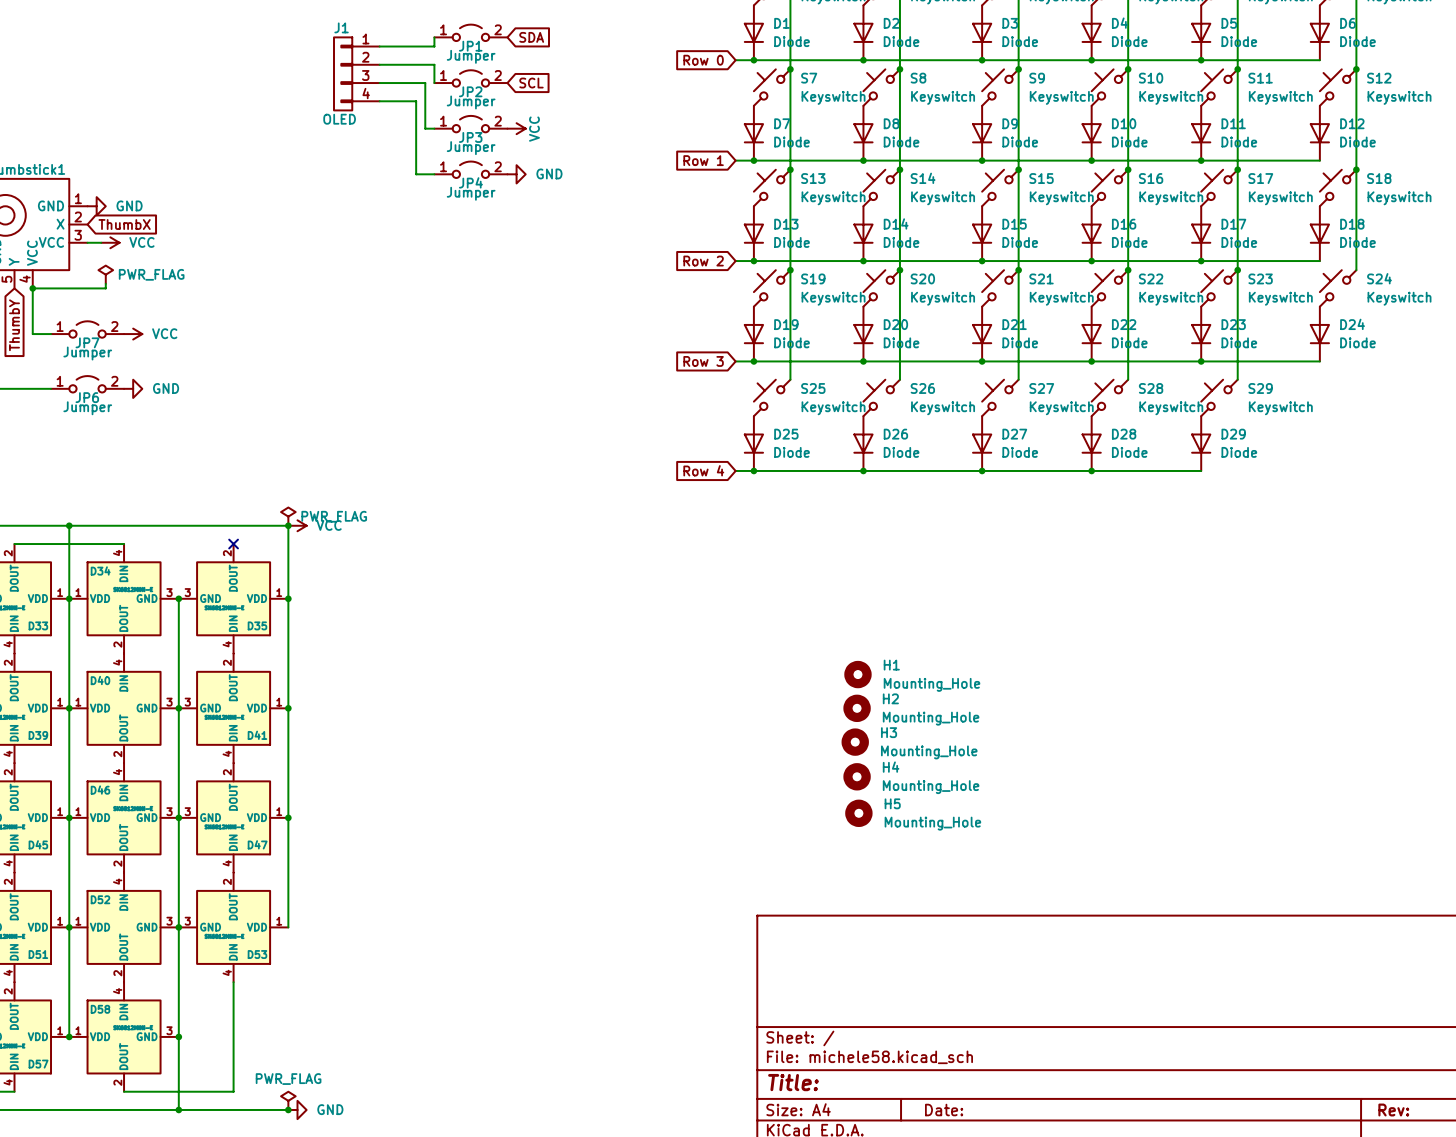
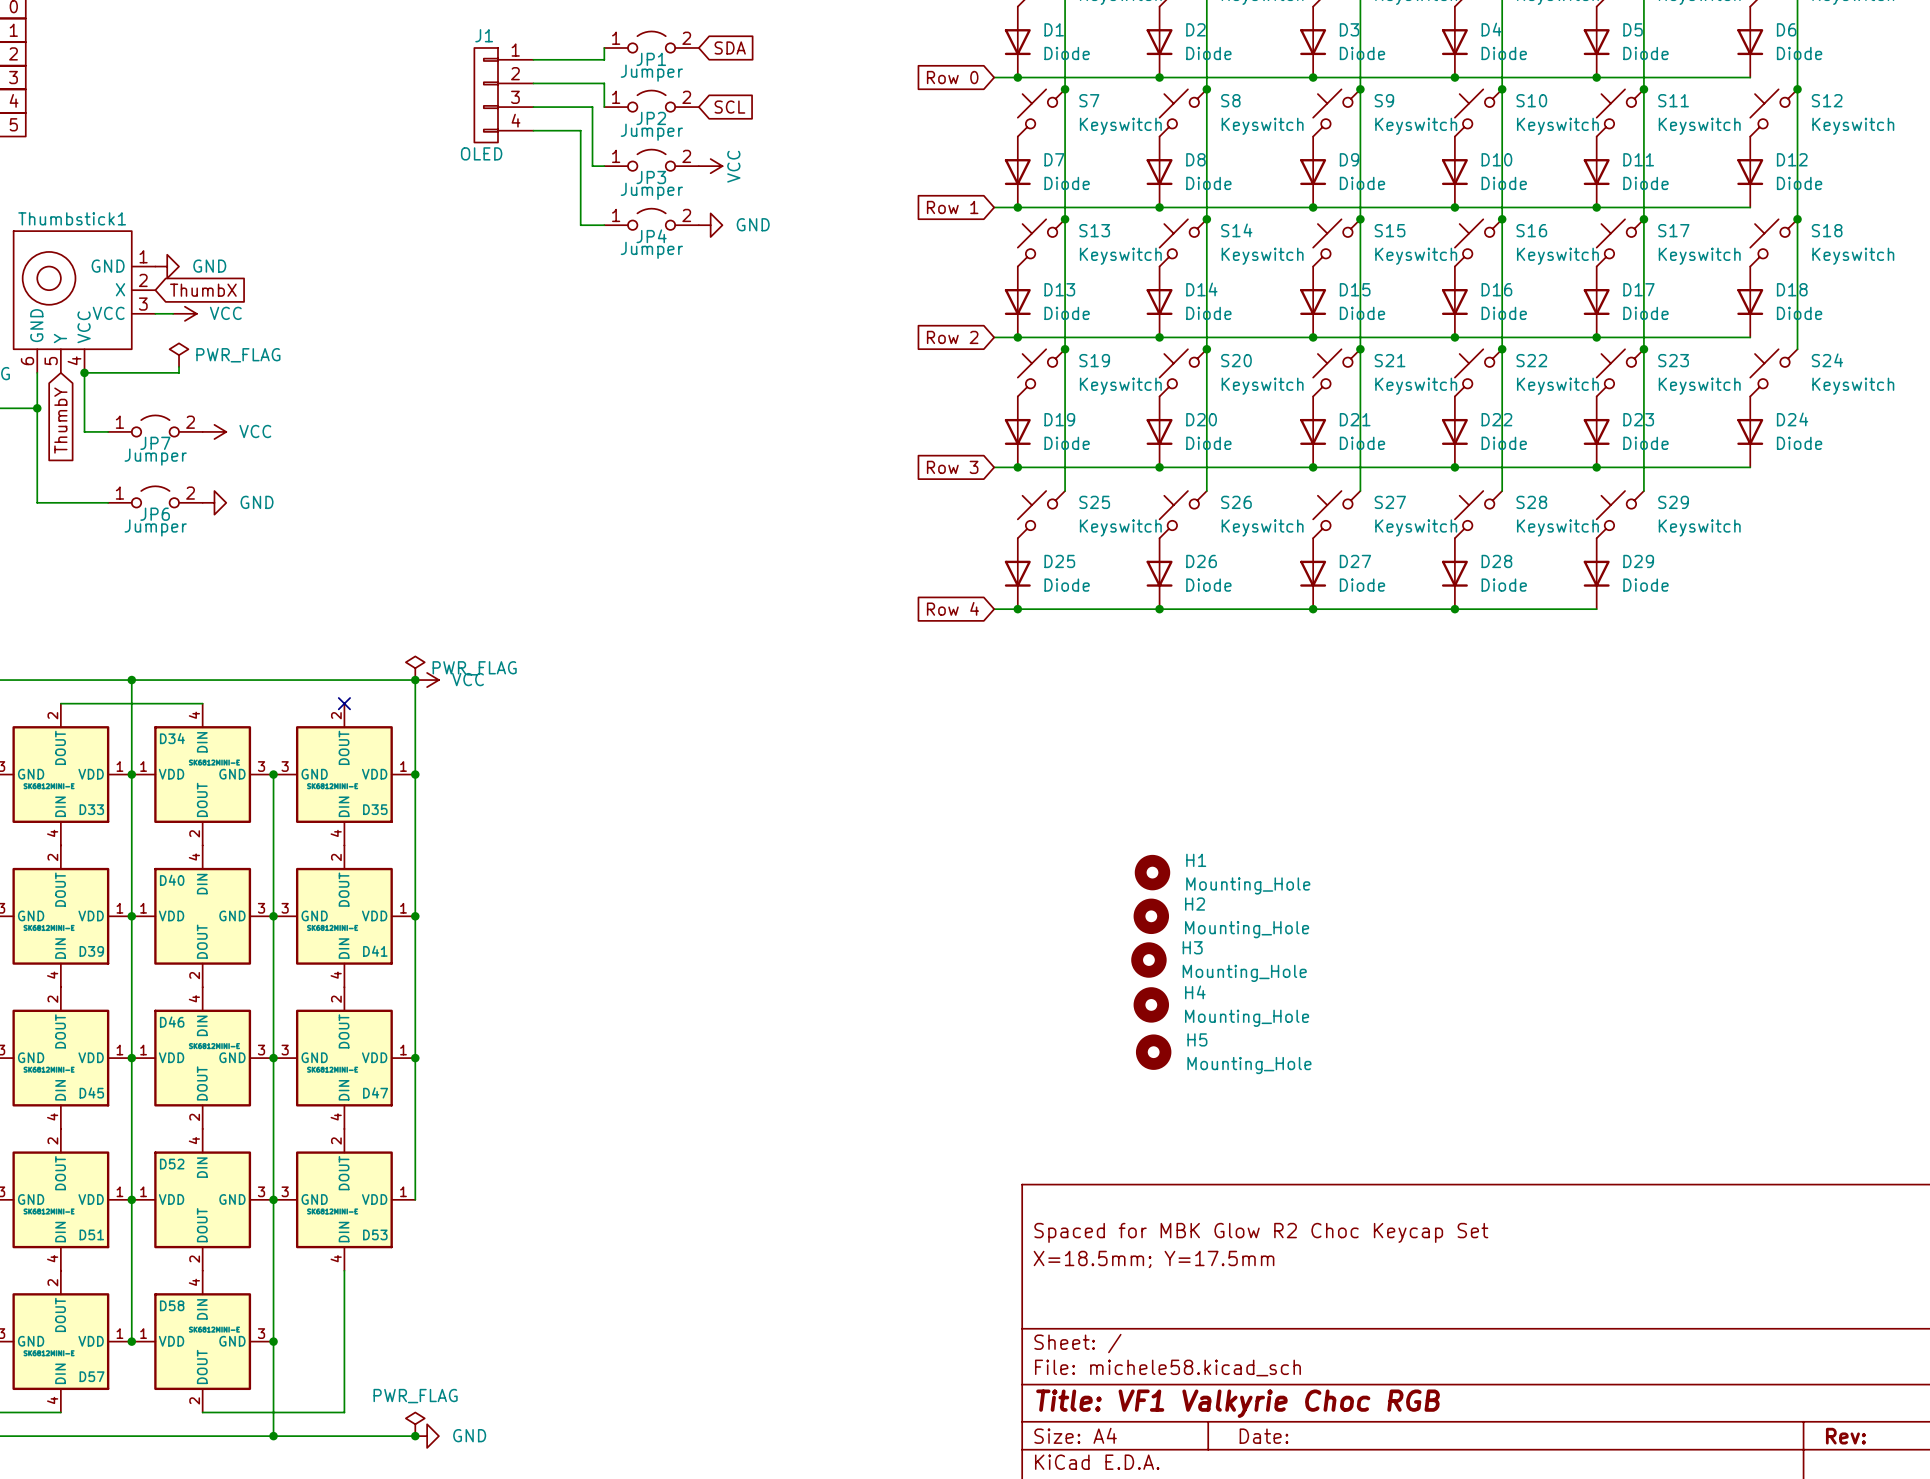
title block: none -> Spaced for MBK Glow R2 Choc Keycap Set (1261, 1232)
title block: none -> X=18.5mm; Y=17.5mm (1154, 1259)
title block: Title: (793, 1082) -> Title: VF1 Valkyrie Choc RGB (1238, 1403)

